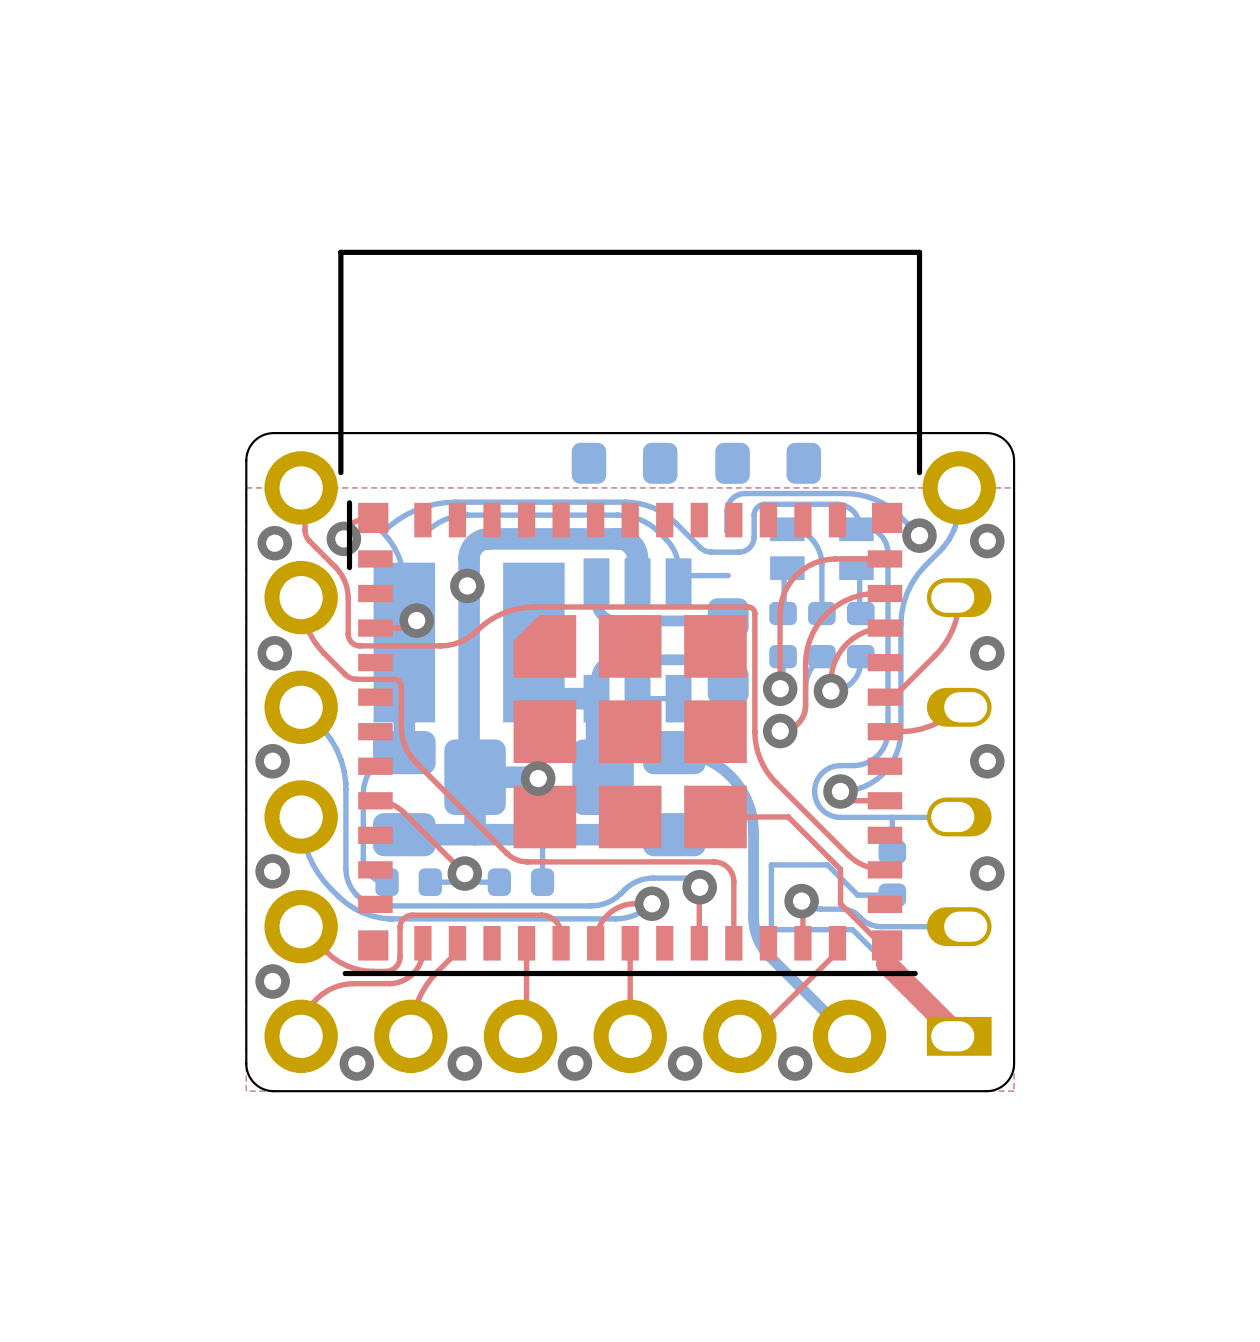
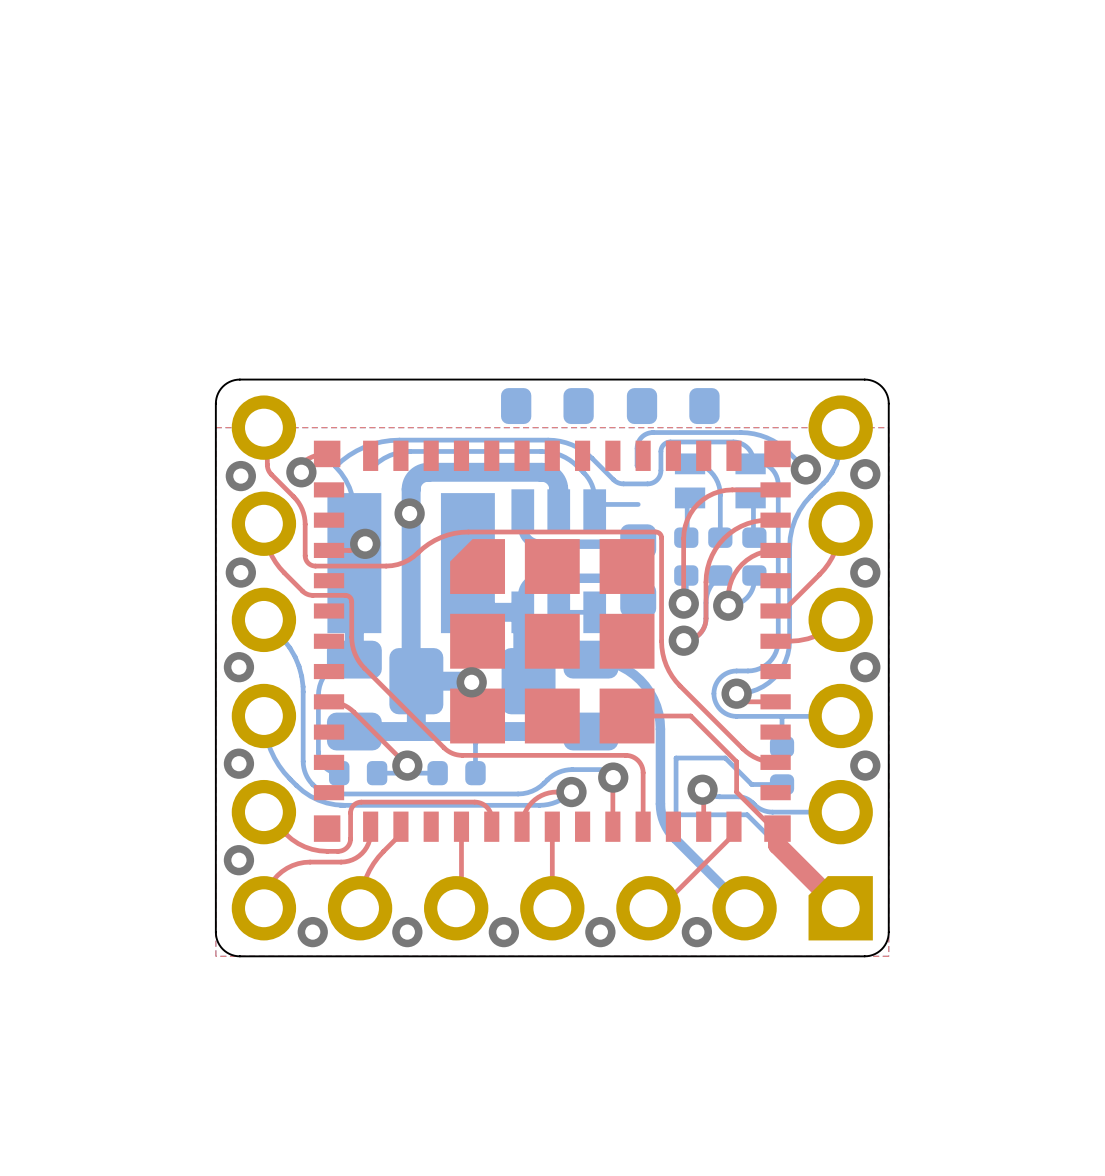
part footprint: [926, 578, 992, 1056] -> [808, 491, 873, 941]
part: (630, 612) -> none

